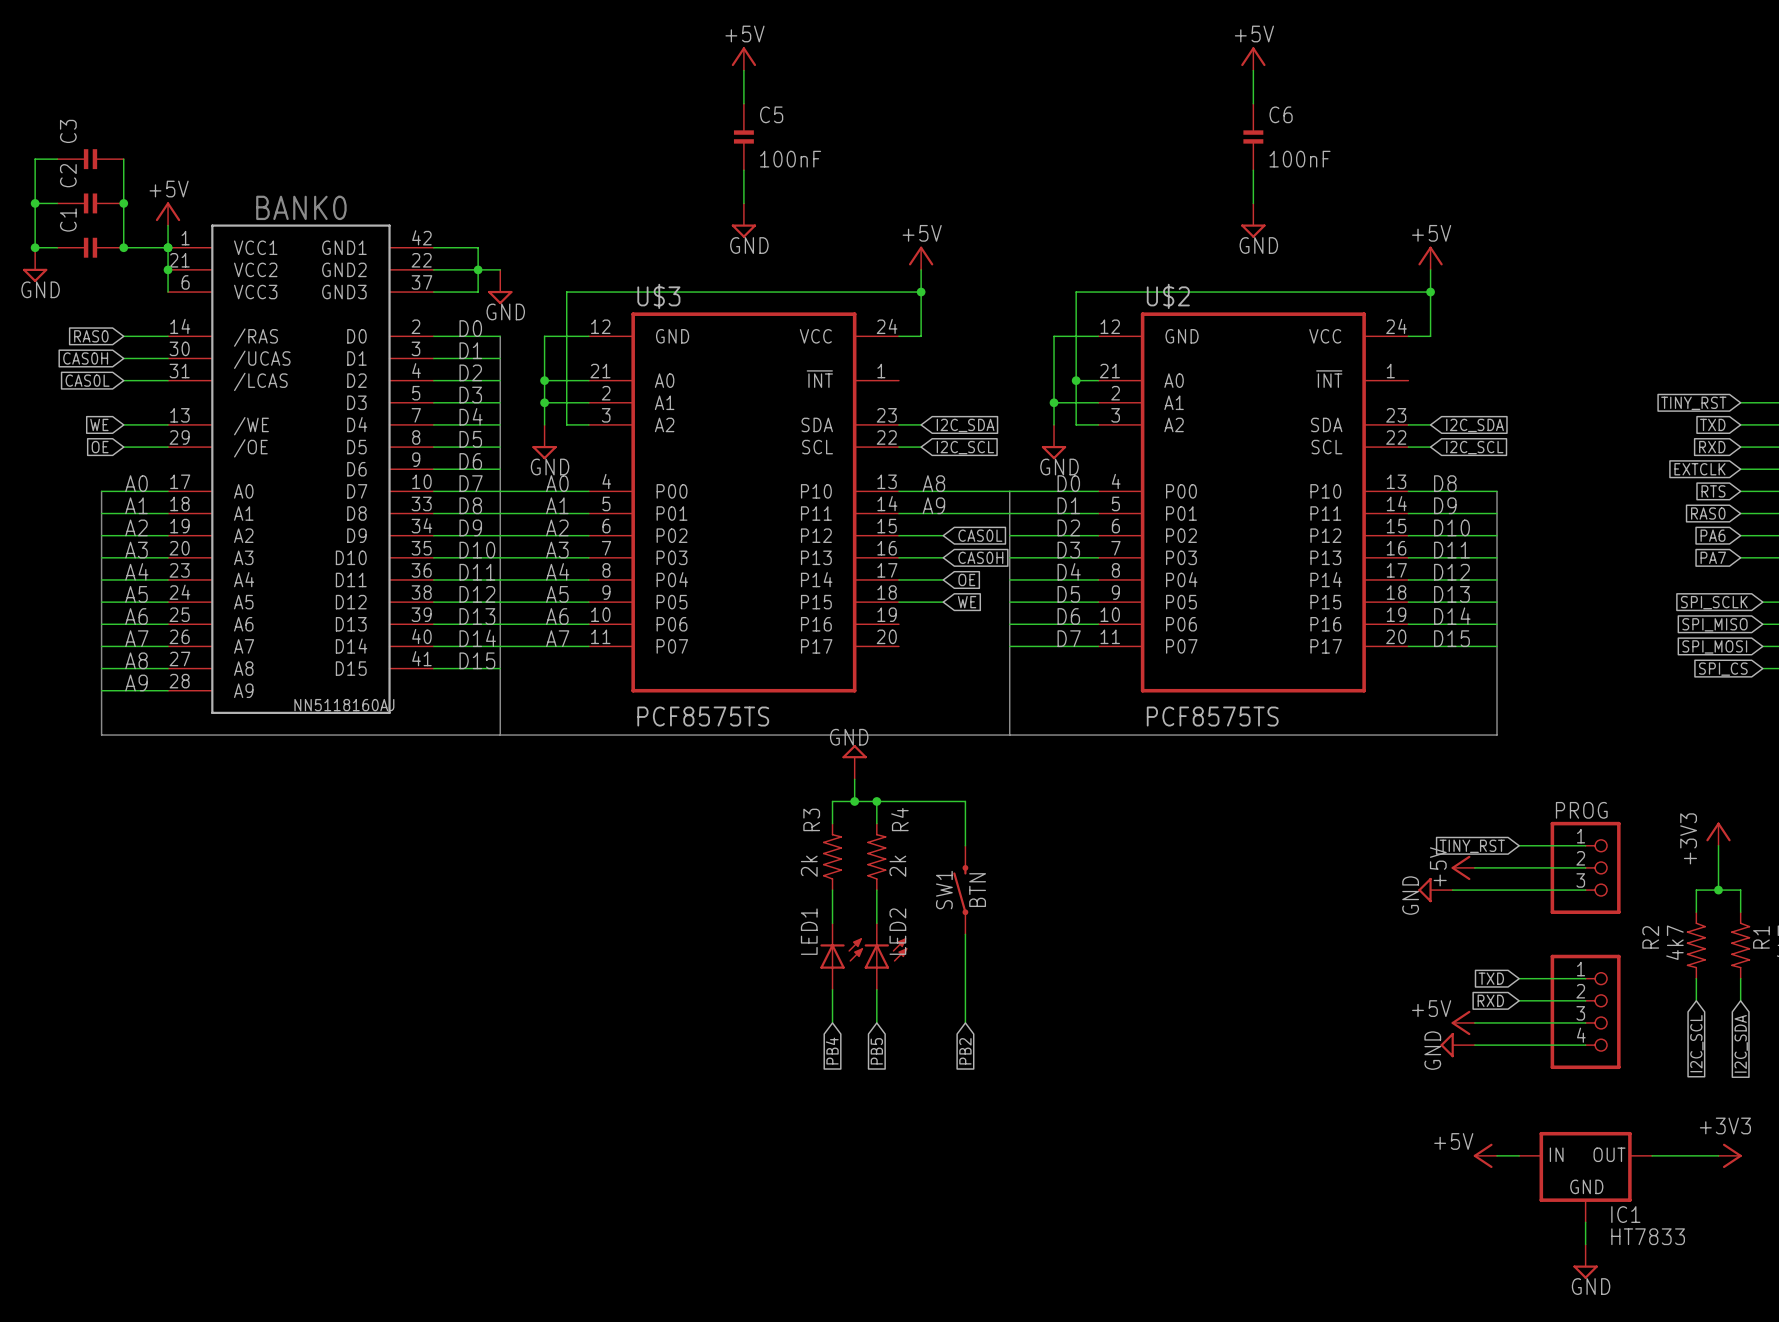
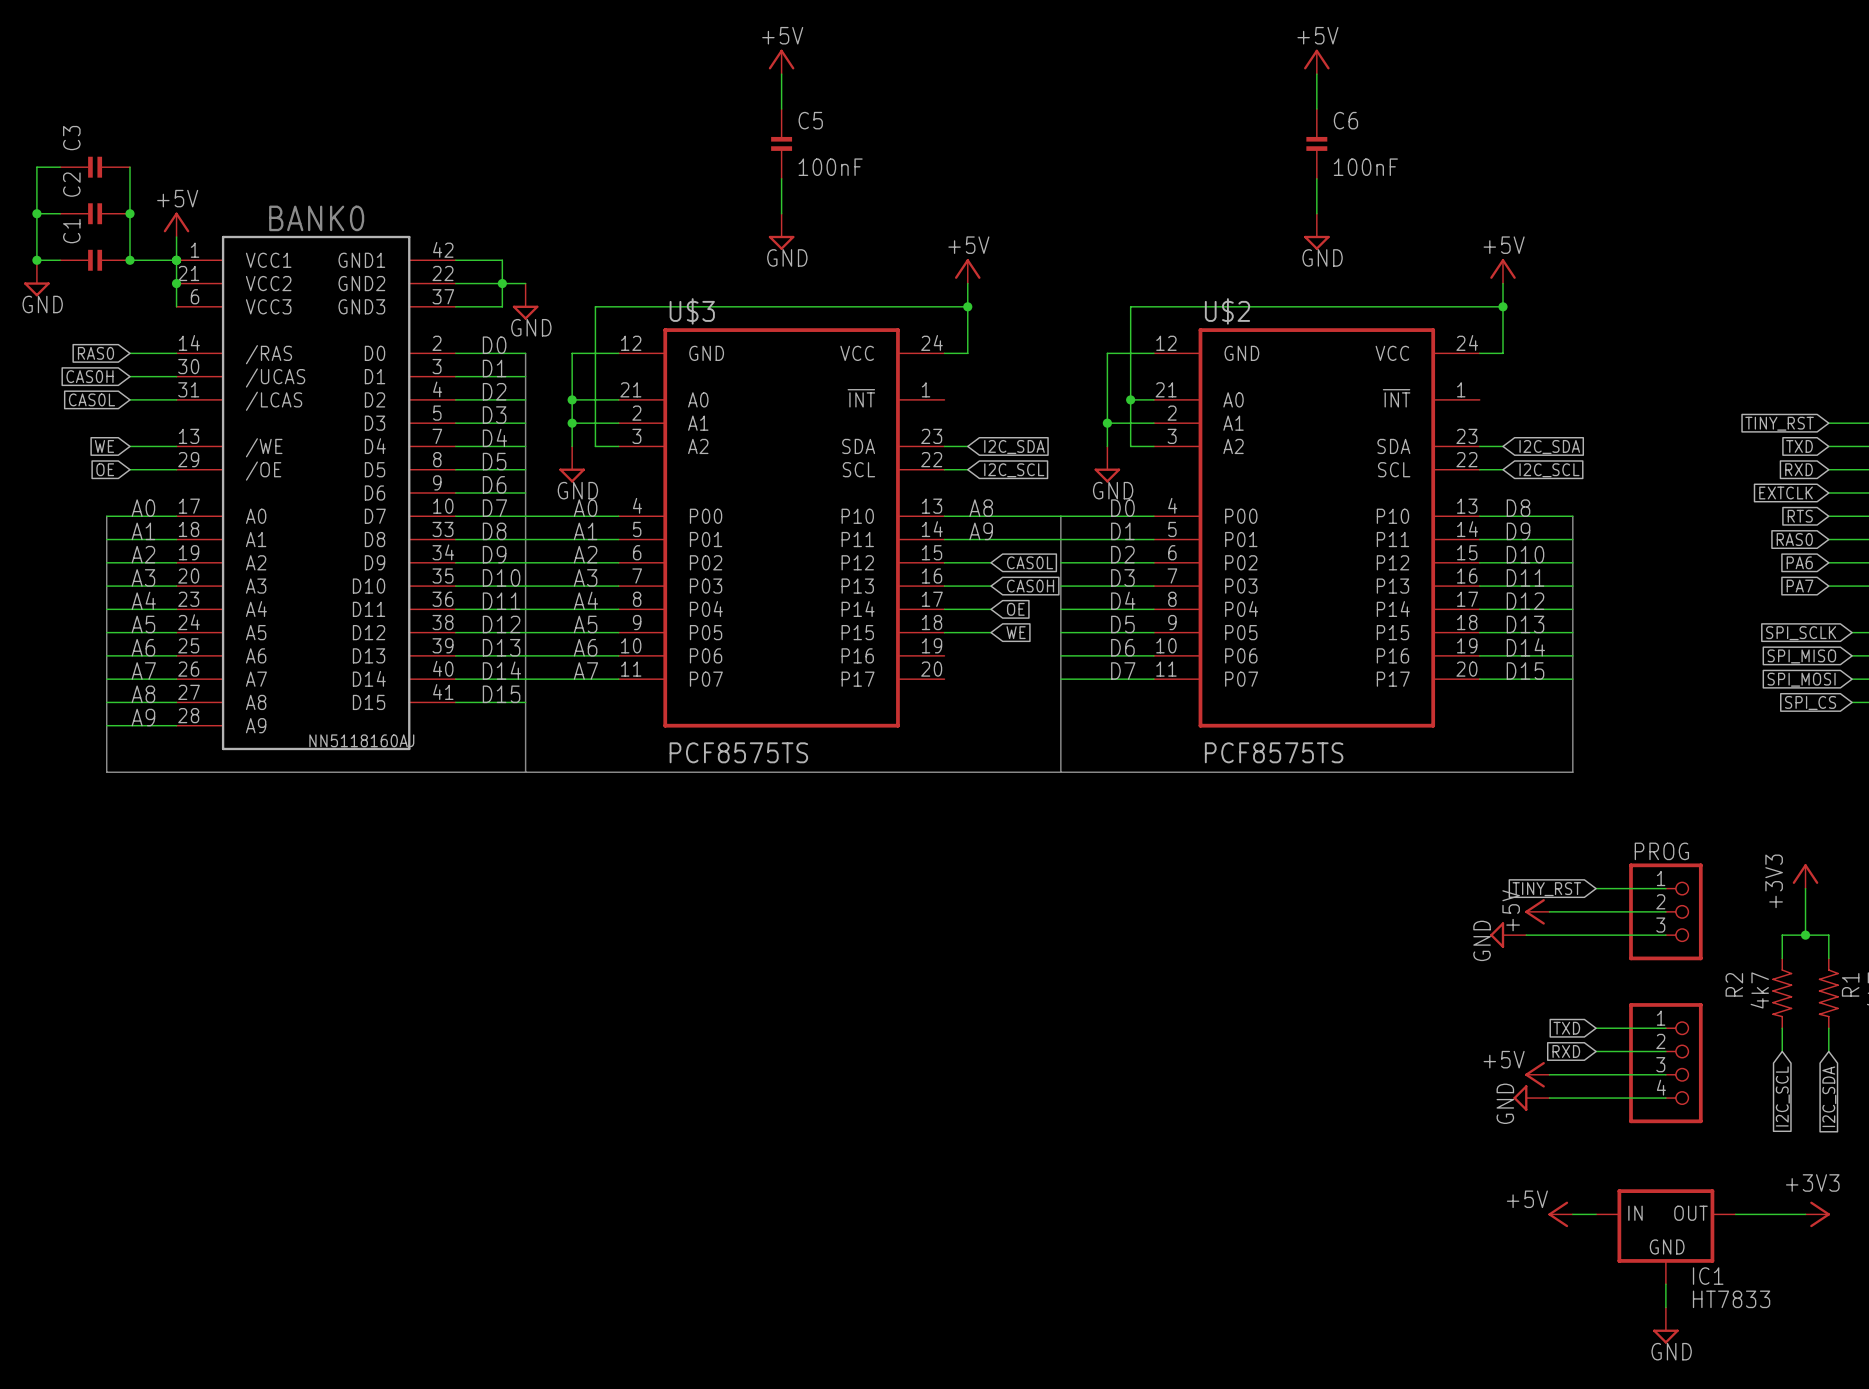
power symbol: GND (854, 762) -> none
wire: (854, 779) (854, 801) -> none
junction: (854, 801) -> none
wire: (876, 801) (876, 823) -> none
junction: (876, 801) -> none
wire: (832, 823) (832, 801) (965, 801) (965, 845) -> none
R3: 2k (832, 856) -> none
R4: 2k (876, 856) -> none
wire: (832, 890) (832, 923) -> none
wire: (876, 890) (876, 923) -> none
SW1: BTN (960, 890) -> none
wire: (965, 934) (965, 1022) -> none
LED1: (841, 956) -> none
LED2: (886, 956) -> none
wire: (832, 989) (832, 1022) -> none
wire: (876, 989) (876, 1022) -> none
global label: PB4 (832, 1051) -> none
global label: PB5 (876, 1051) -> none
global label: PB2 (965, 1051) -> none

